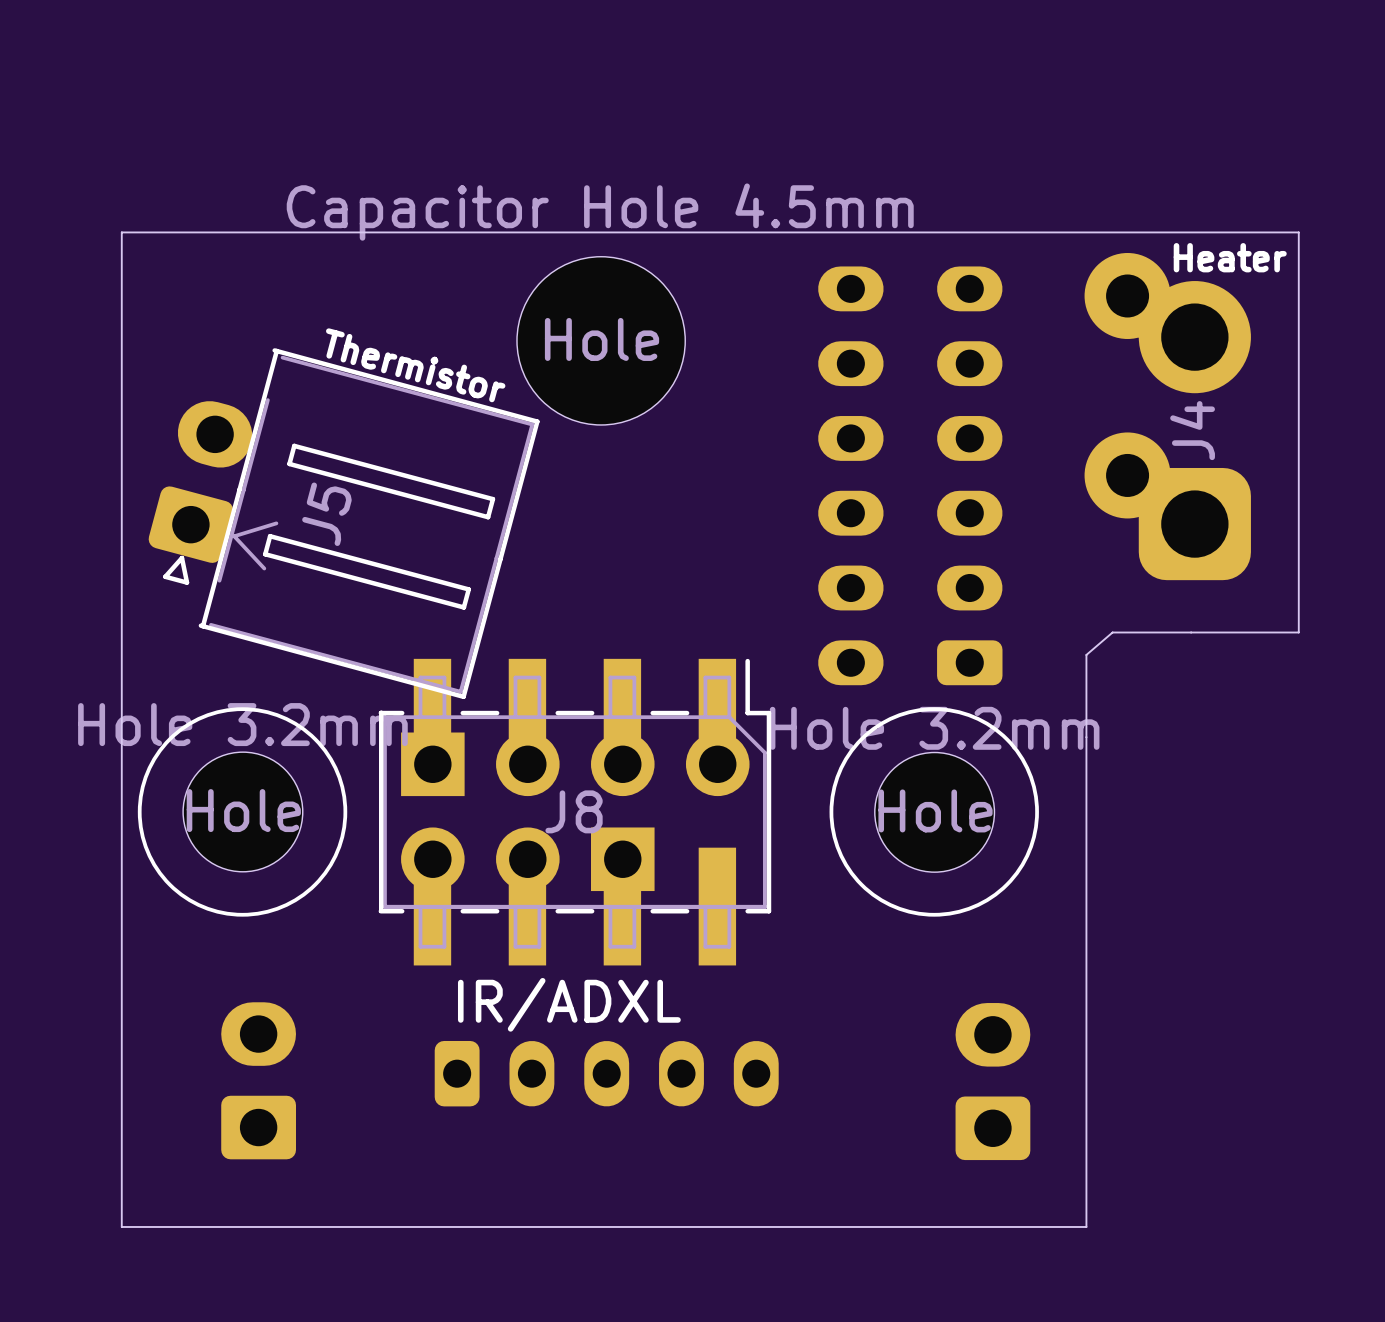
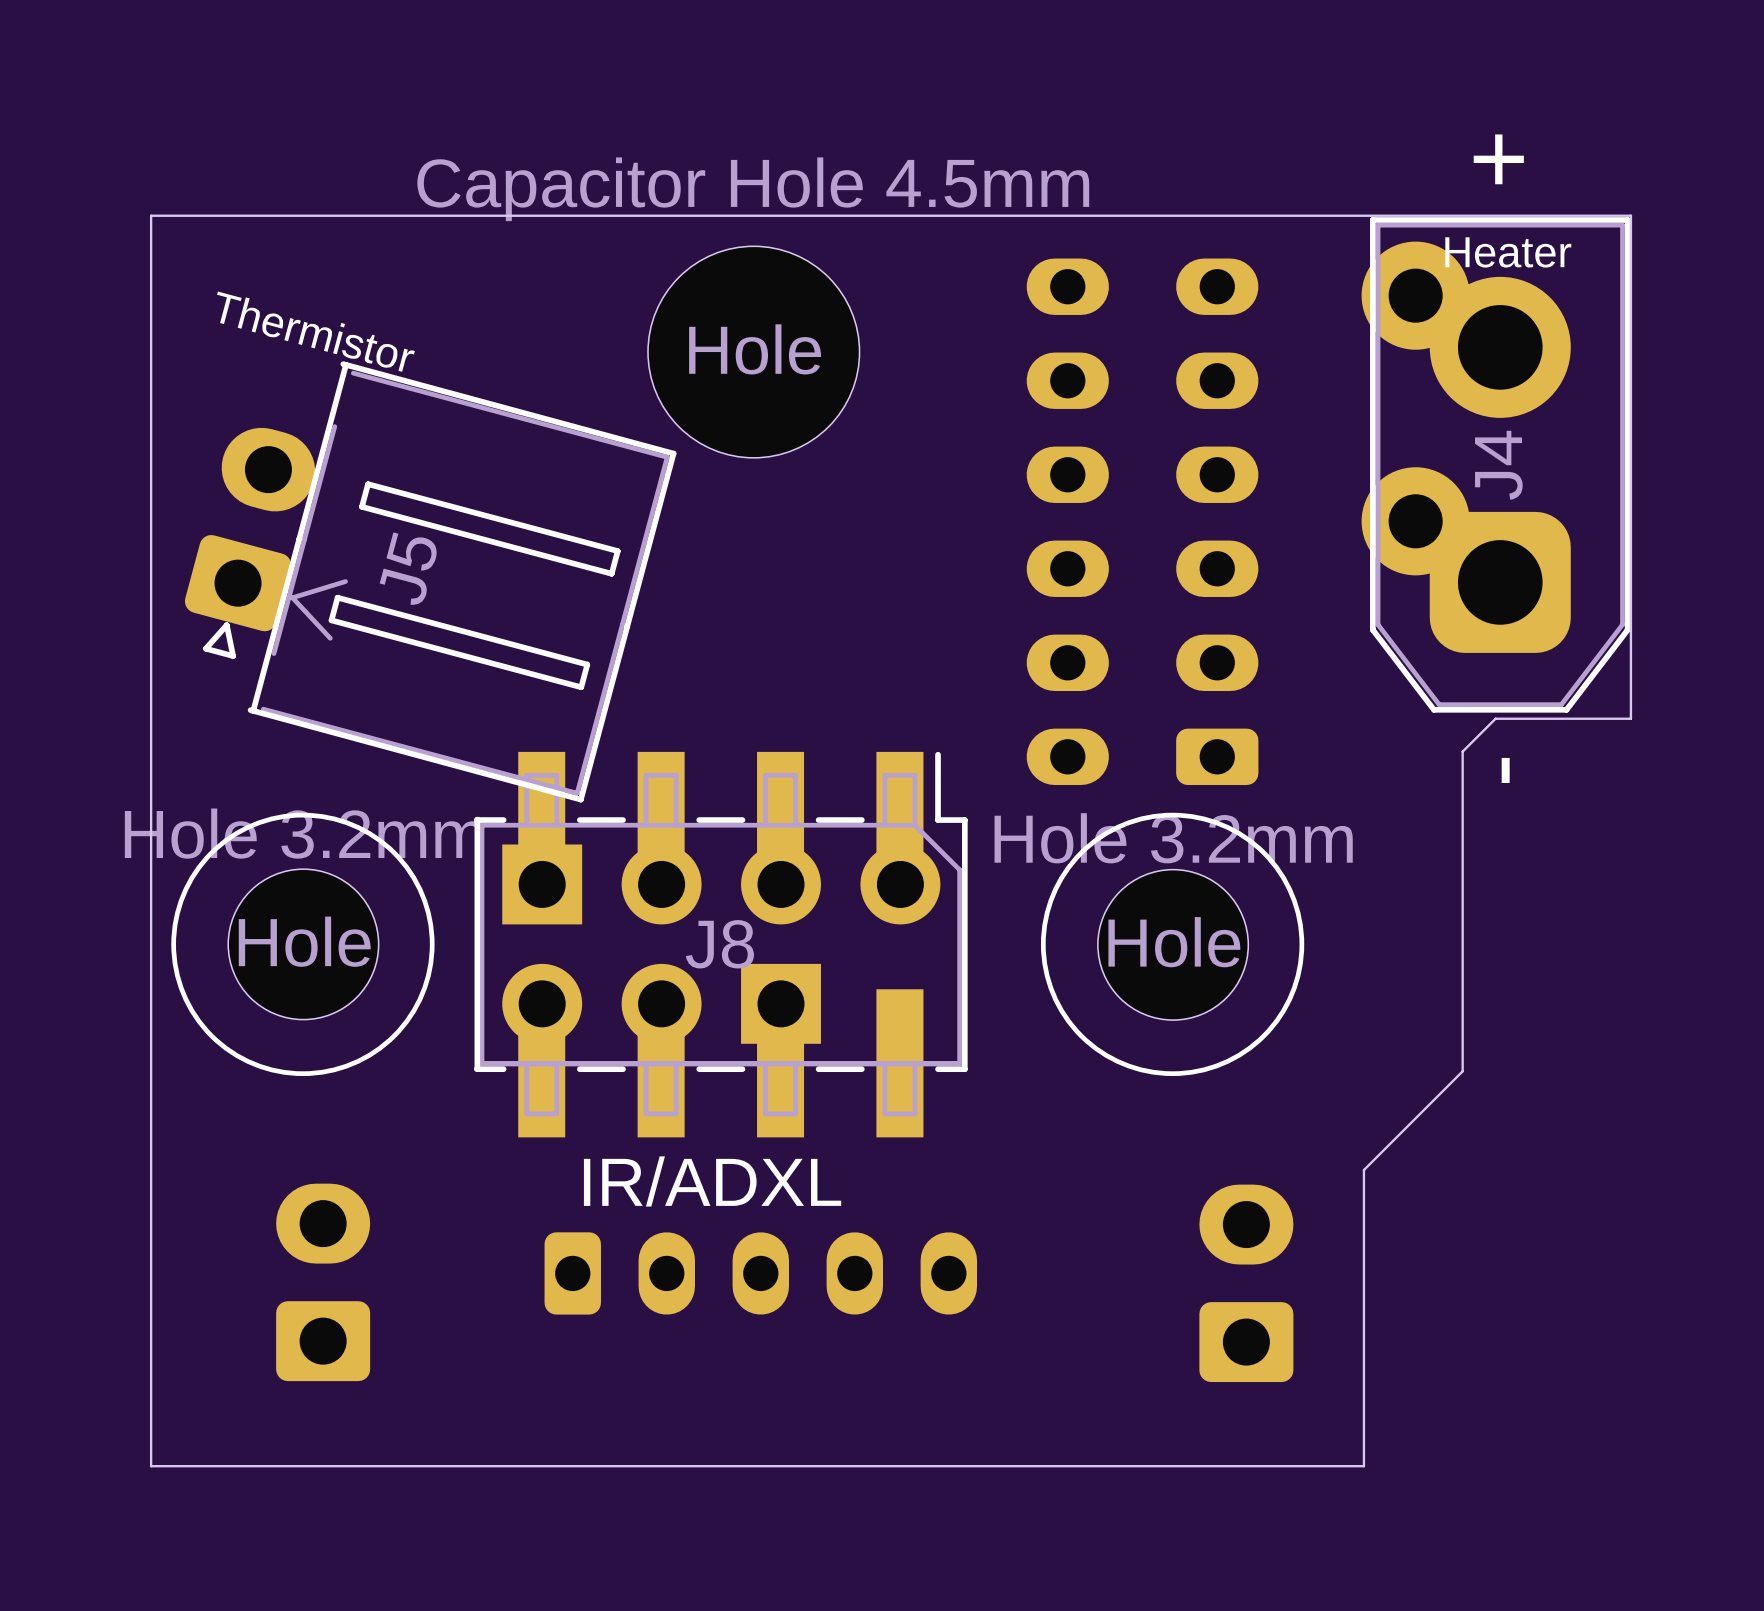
J4 footprint: [1138, 281, 1251, 581] -> [1370, 217, 1631, 713]
J5 value position: Thermistor (415, 365) -> Thermistor (315, 331)
board edge: (1191, 632) (1112, 632) (1086, 654) (1086, 991) -> (1495, 718) (1462, 751) (1462, 1071) (1363, 1170)

